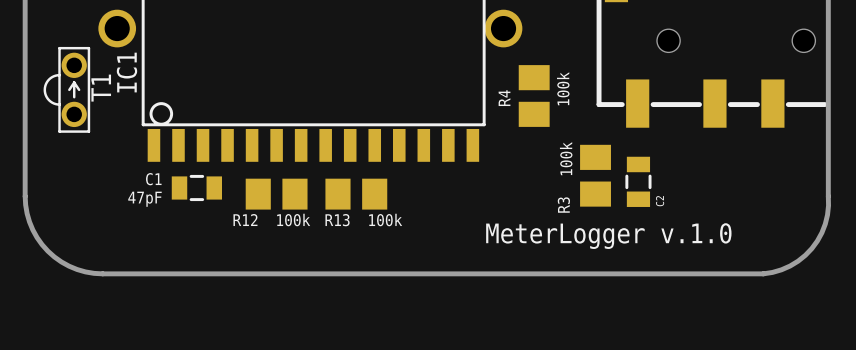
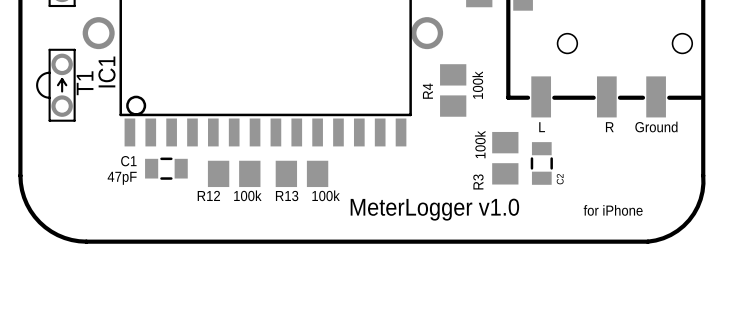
text: none -> L (542, 127)
text: none -> R (609, 127)
text: none -> Ground (656, 126)
text: MeterLogger v.1.0 (608, 236) -> MeterLogger v1.0 (434, 209)
text: none -> for iPhone (613, 210)

